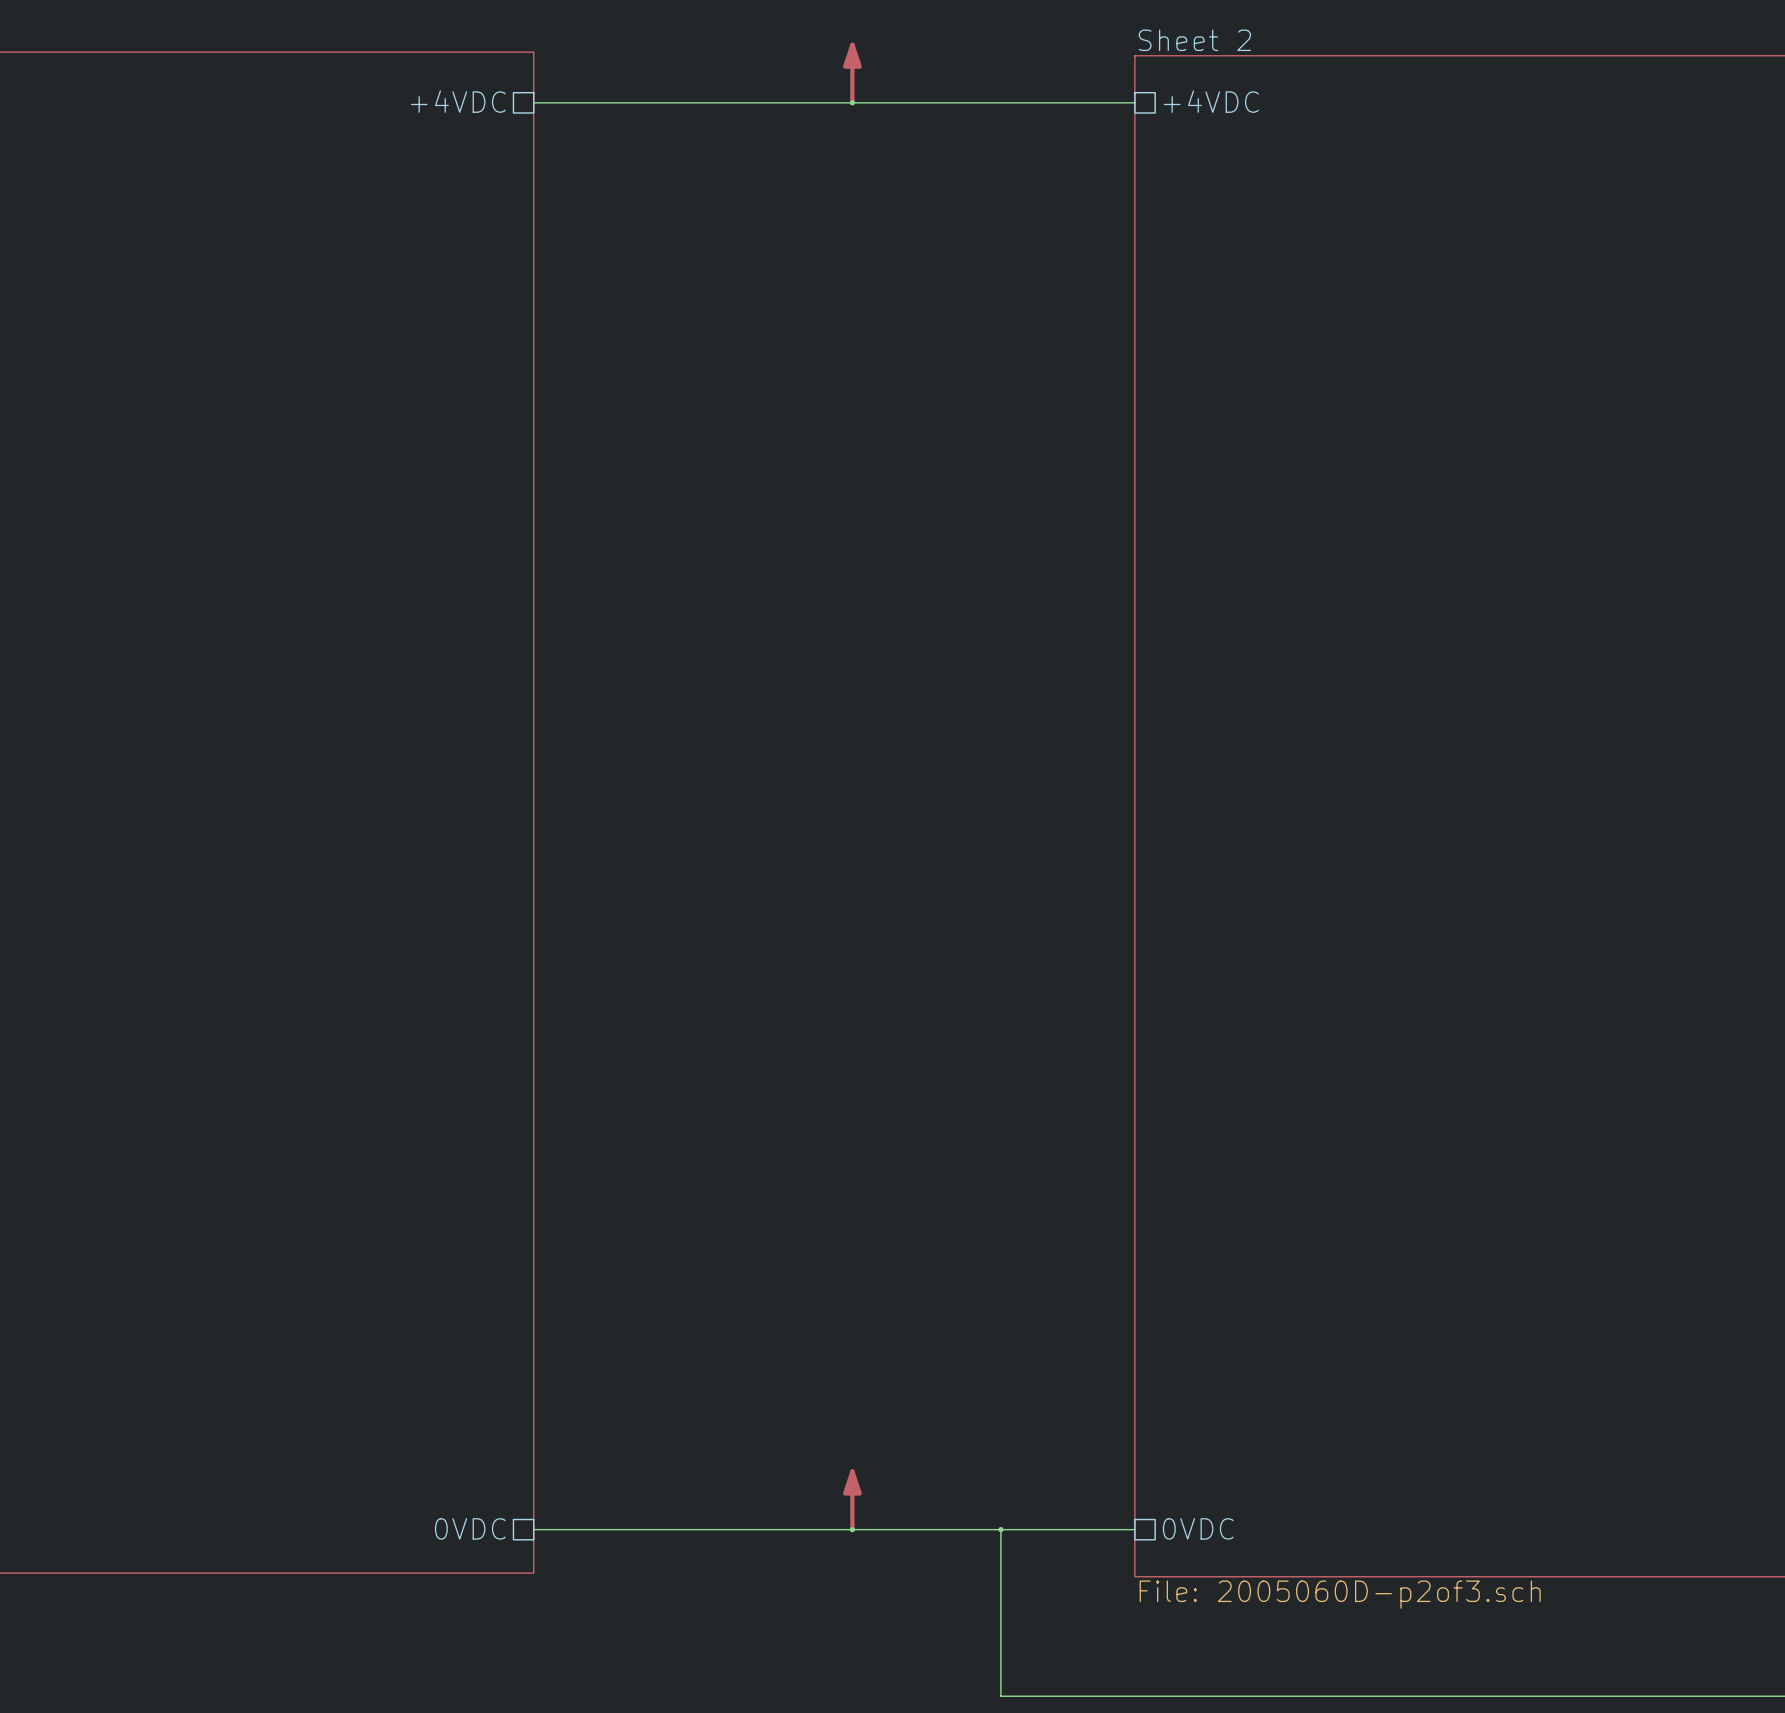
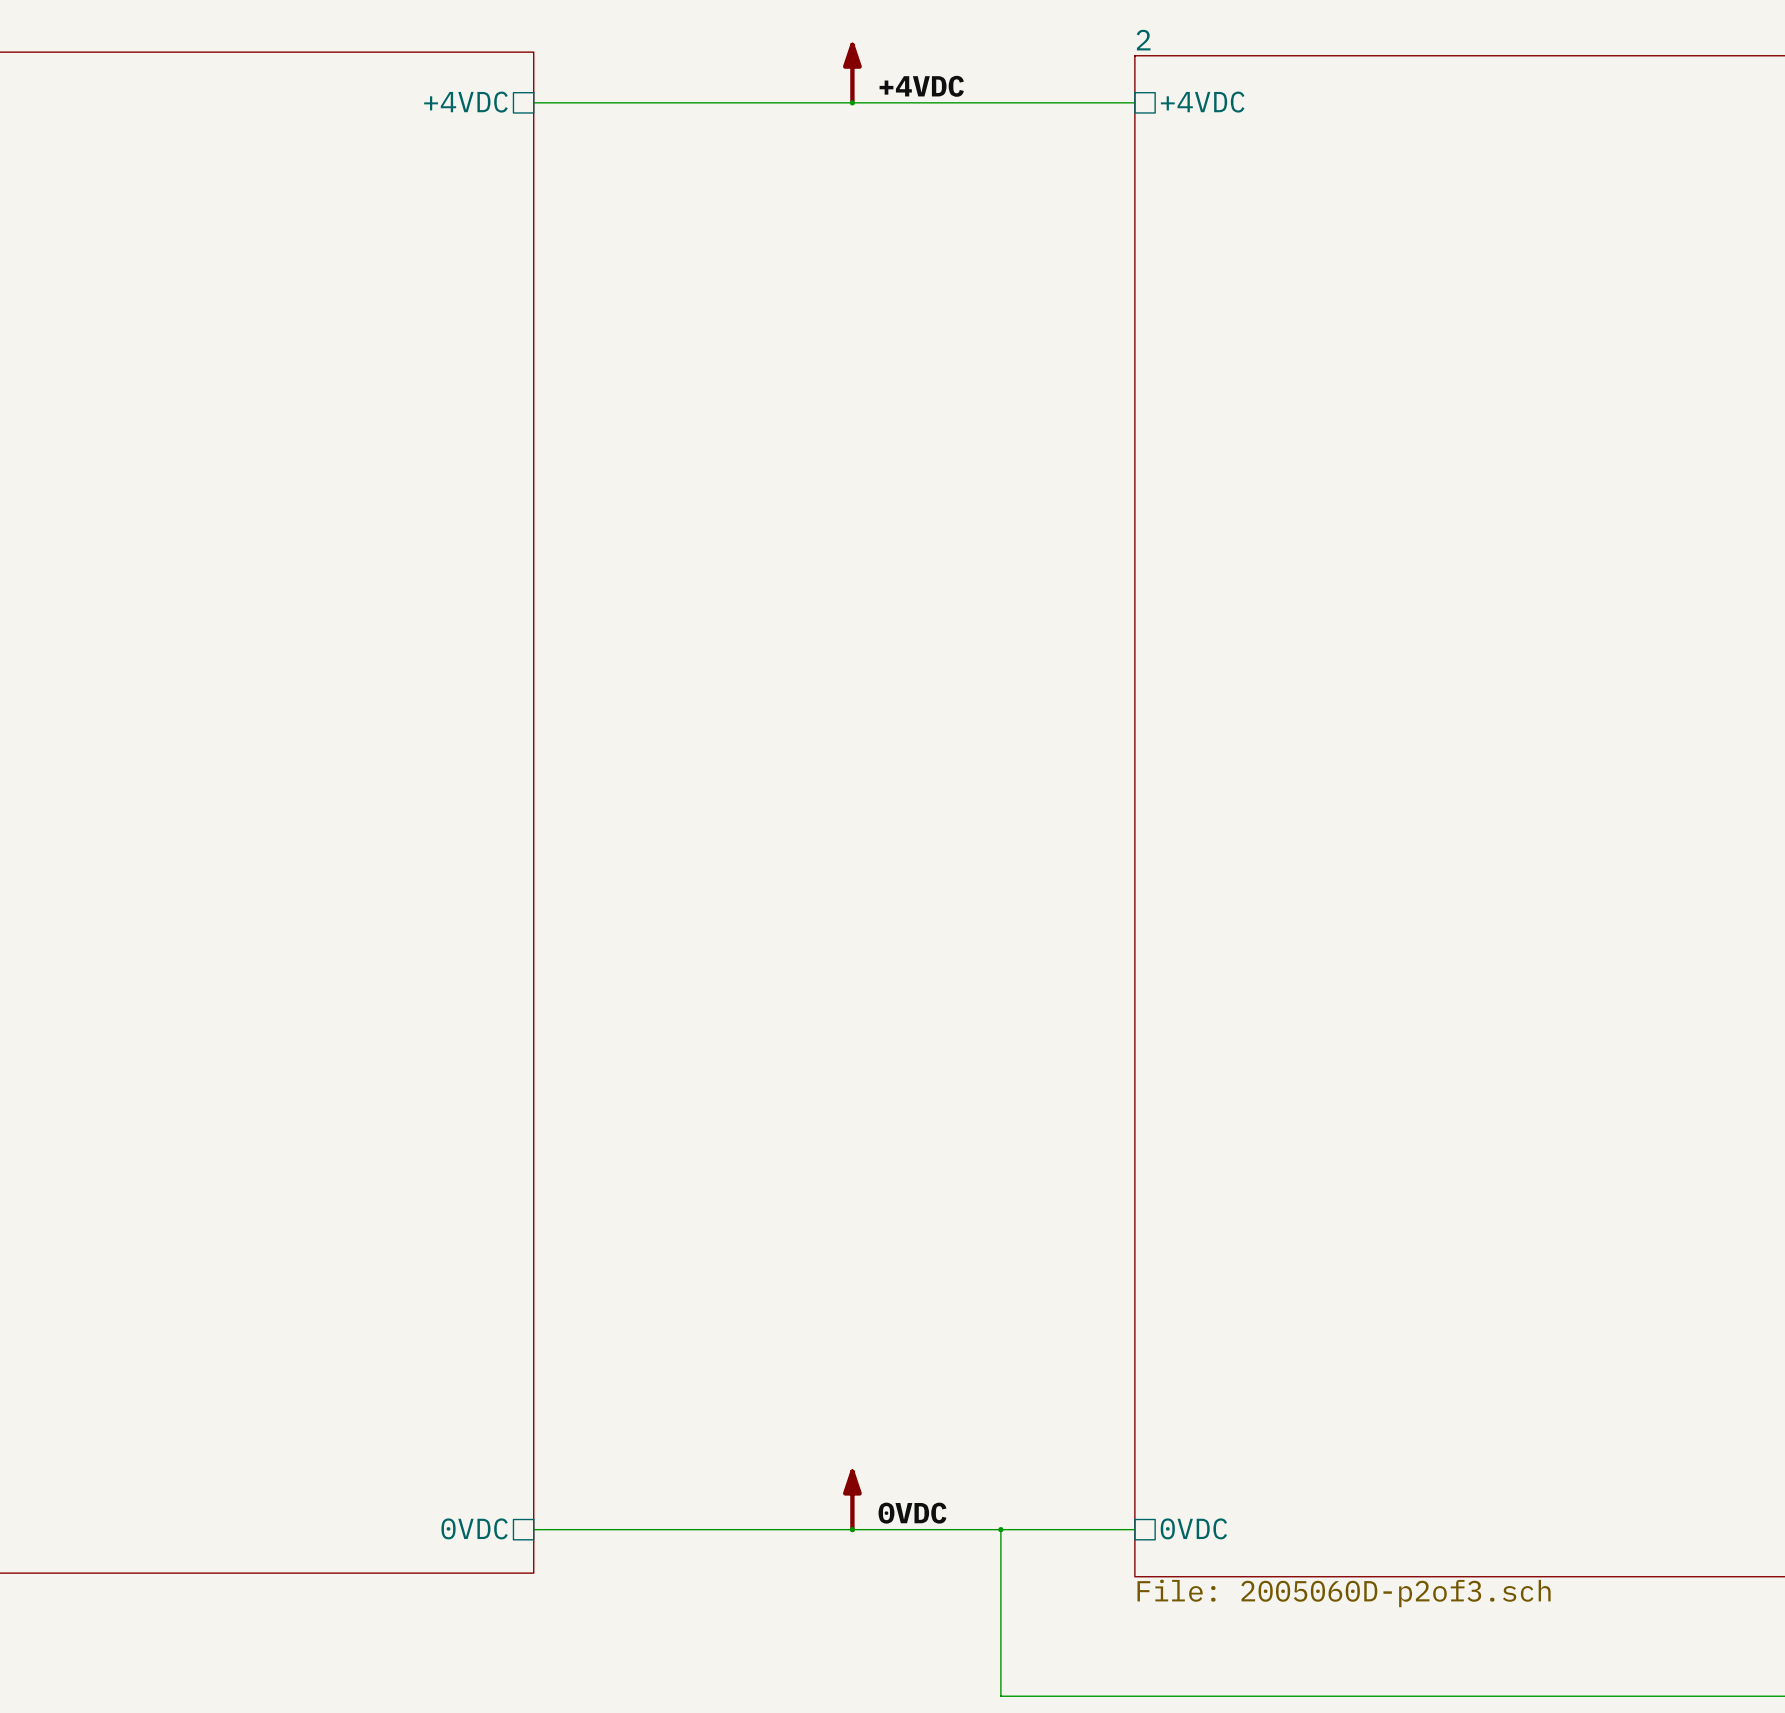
sheet Sheet 2 name: Sheet 2 (1194, 40) -> 2 (1143, 40)
label: none -> +4VDC (921, 86)
label: none -> 0VDC (912, 1513)

